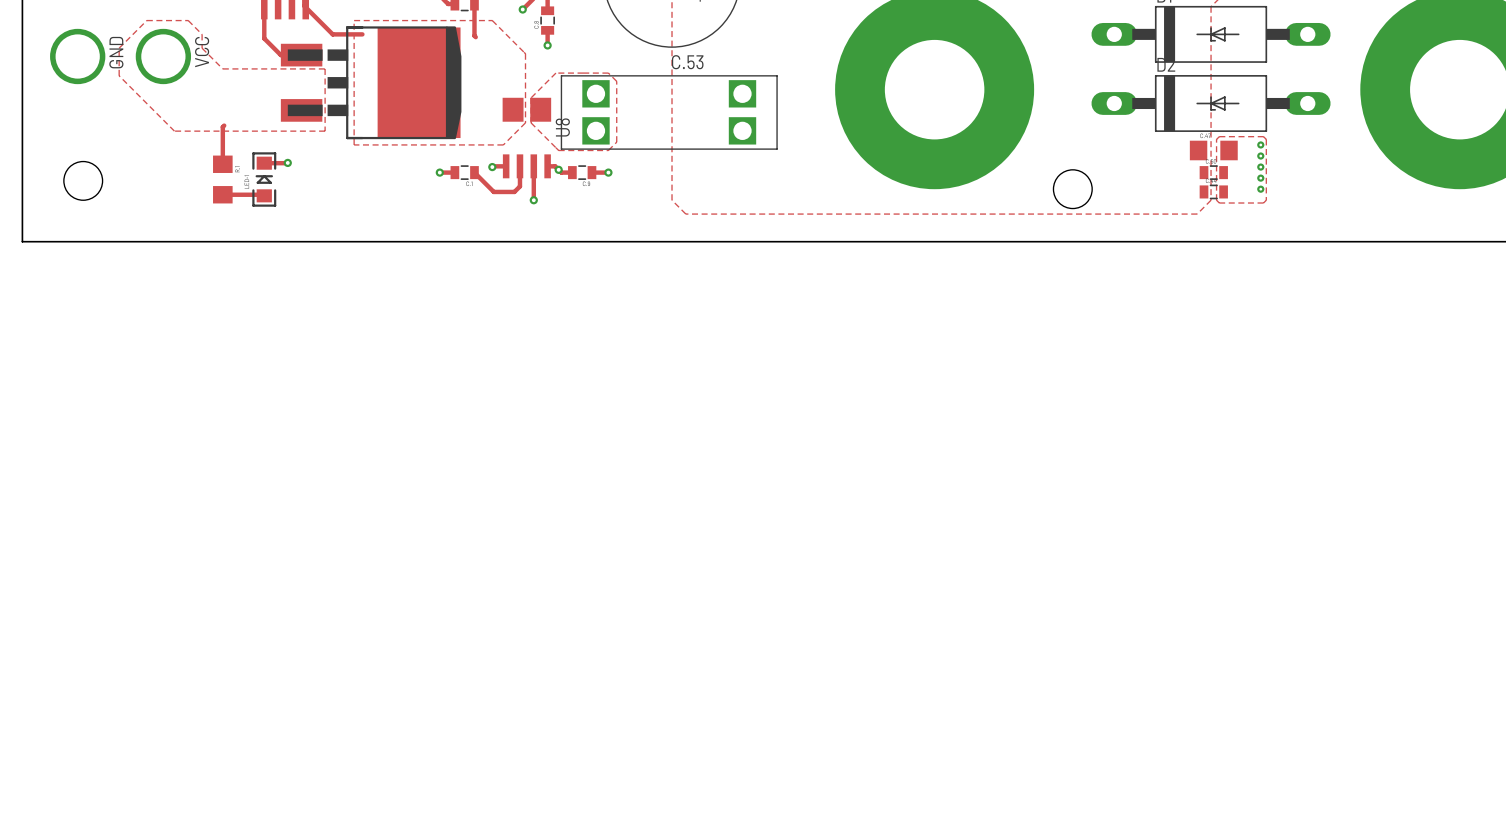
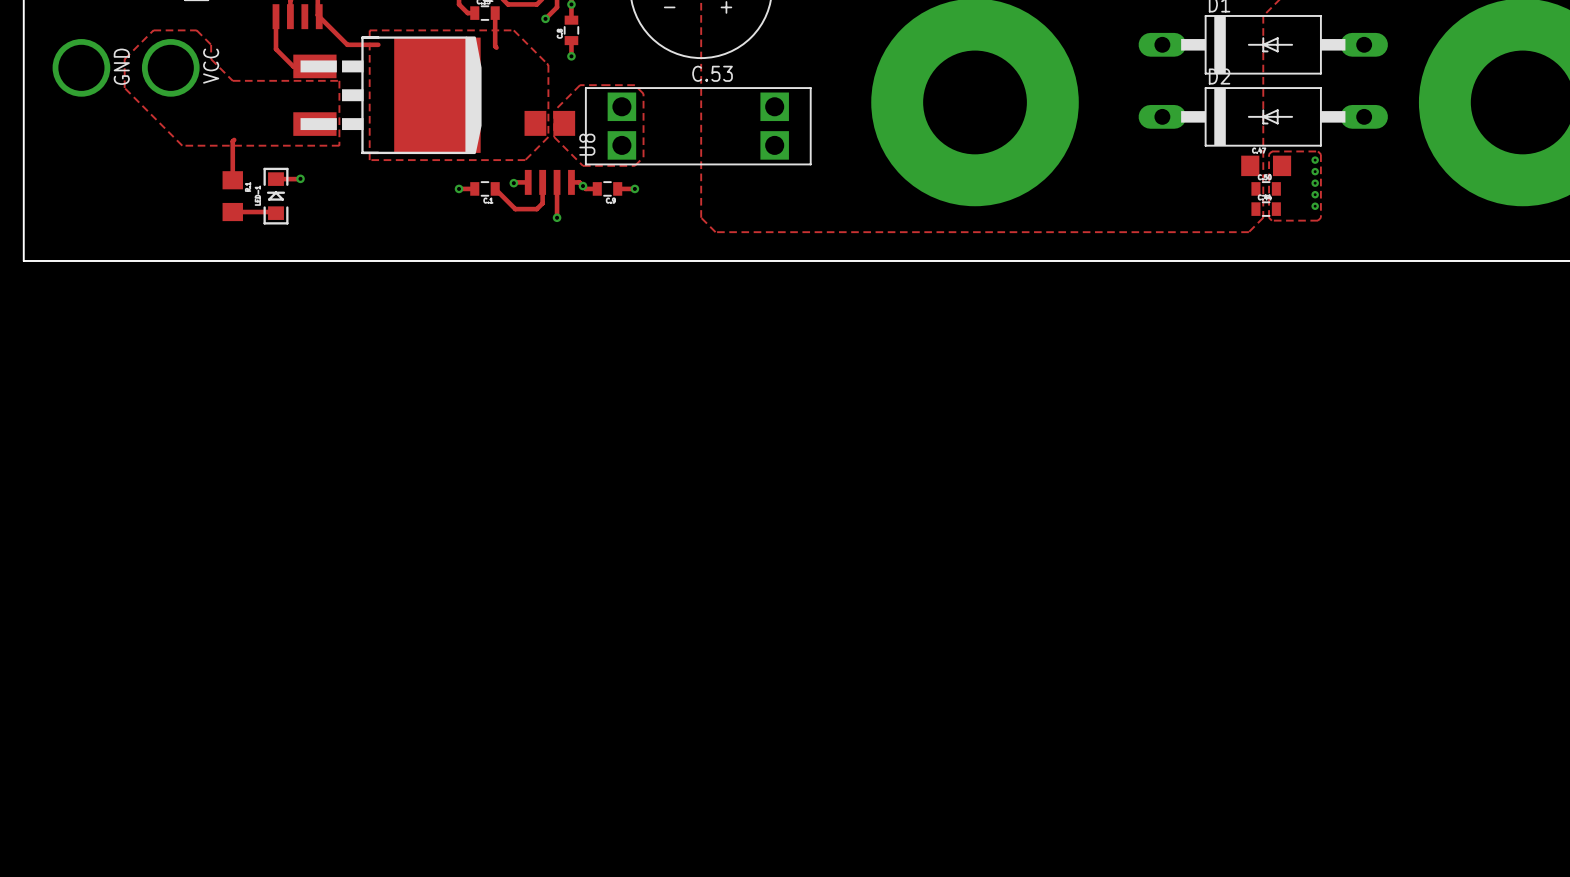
drawing: [63, 161, 103, 201] -> none
drawing: [1053, 169, 1093, 209] -> none

